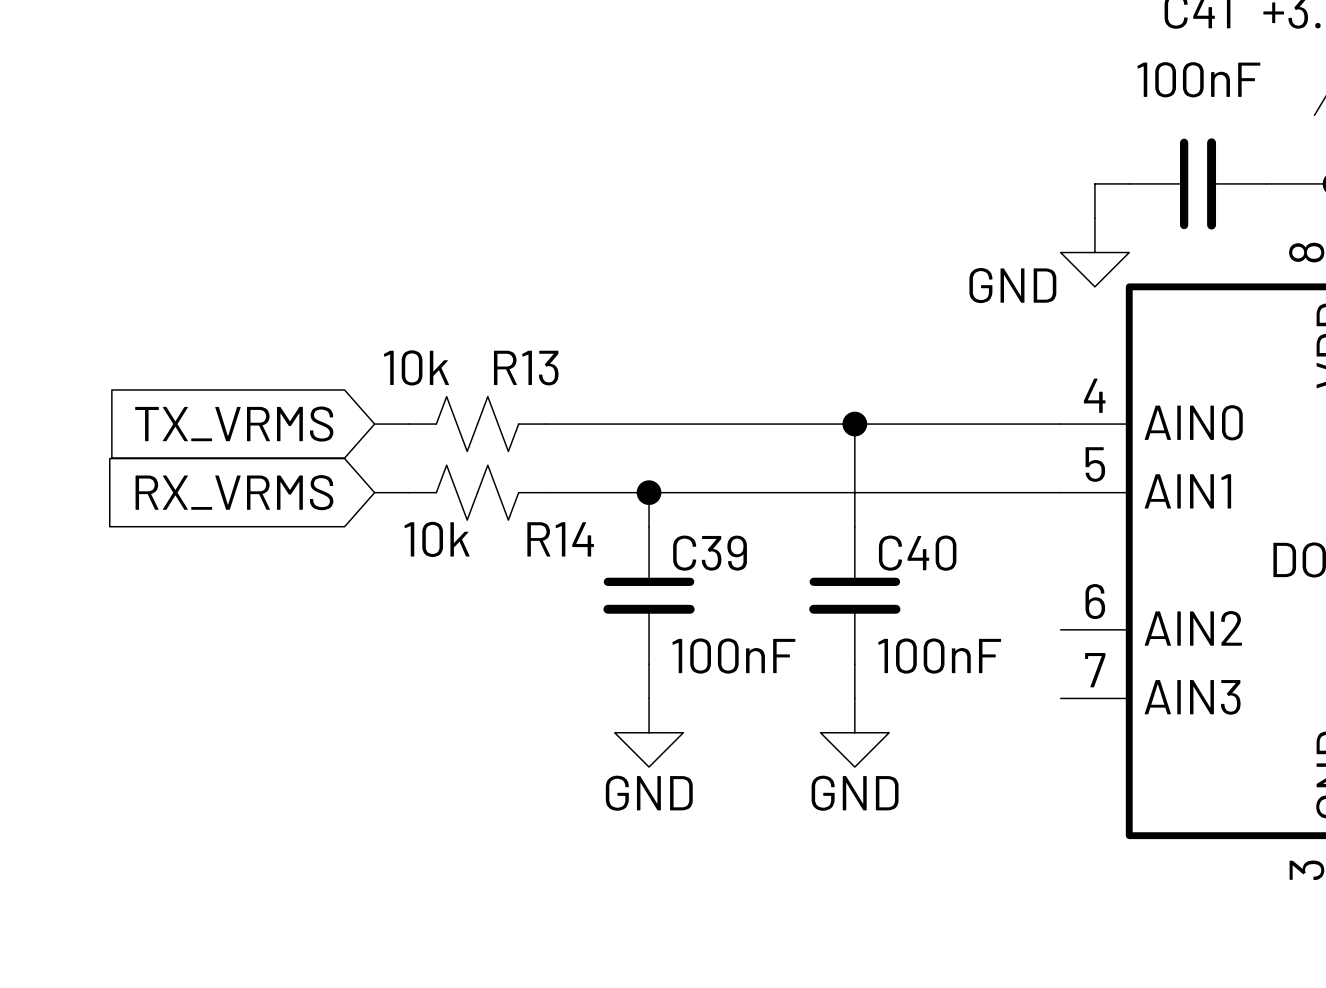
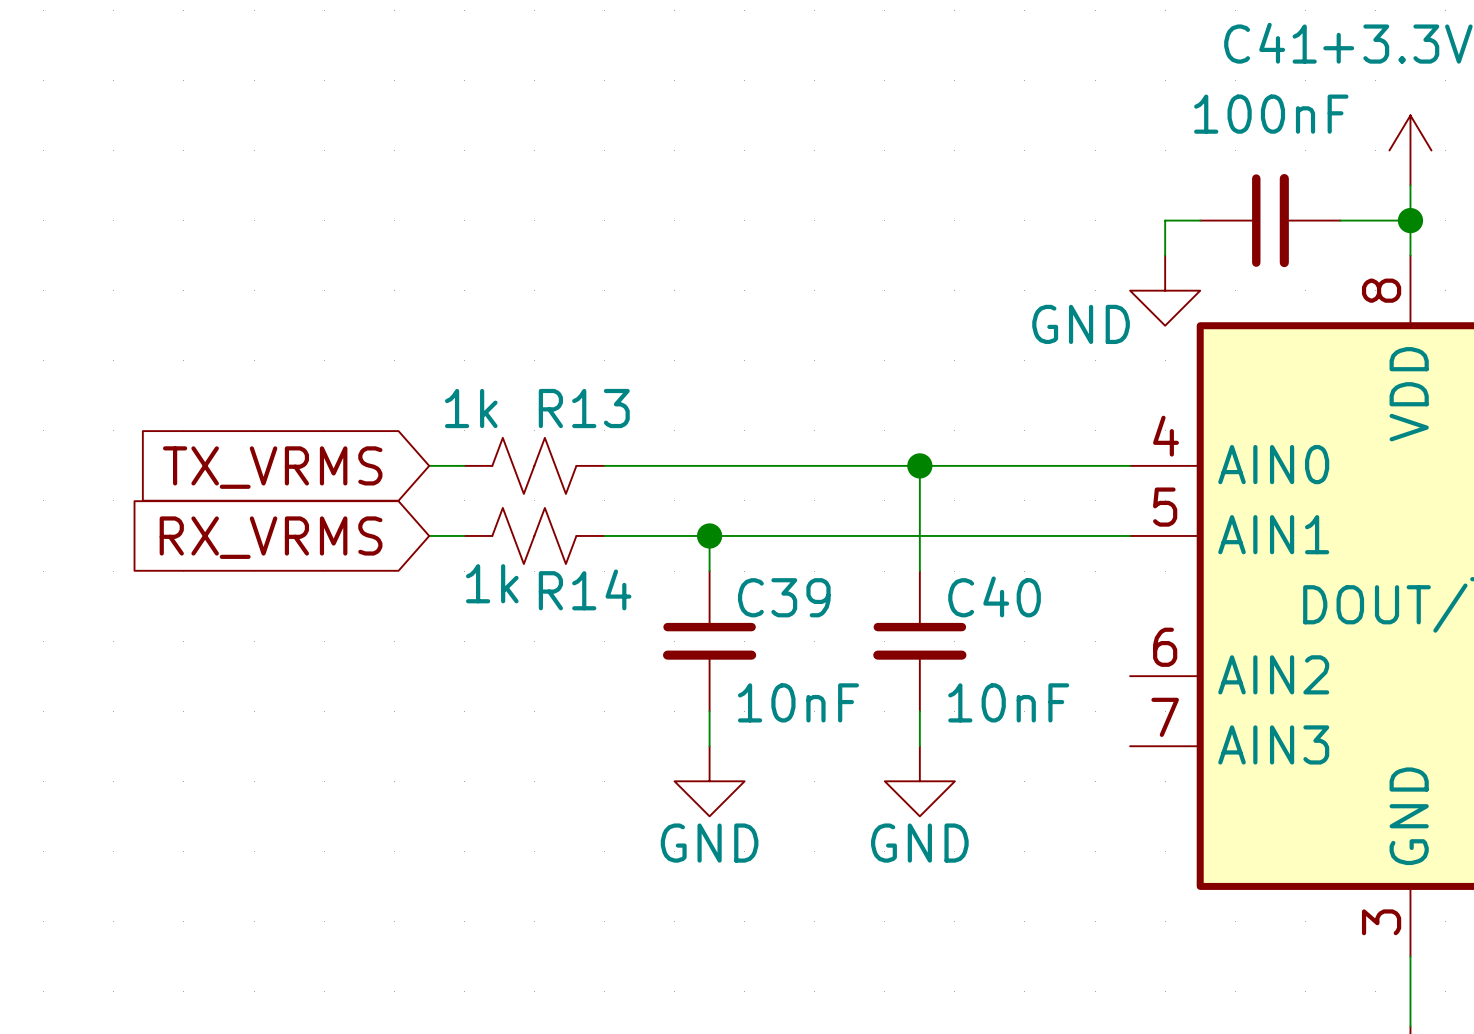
R13 value: 10k (416, 367) -> 1k (471, 408)
R14 value: 10k (437, 539) -> 1k (492, 583)
R14 name position: R14 (560, 539) -> R14 (585, 589)
C39 value: 100nF (733, 656) -> 10nF (798, 702)
C40 value: 100nF (939, 656) -> 10nF (1008, 702)

